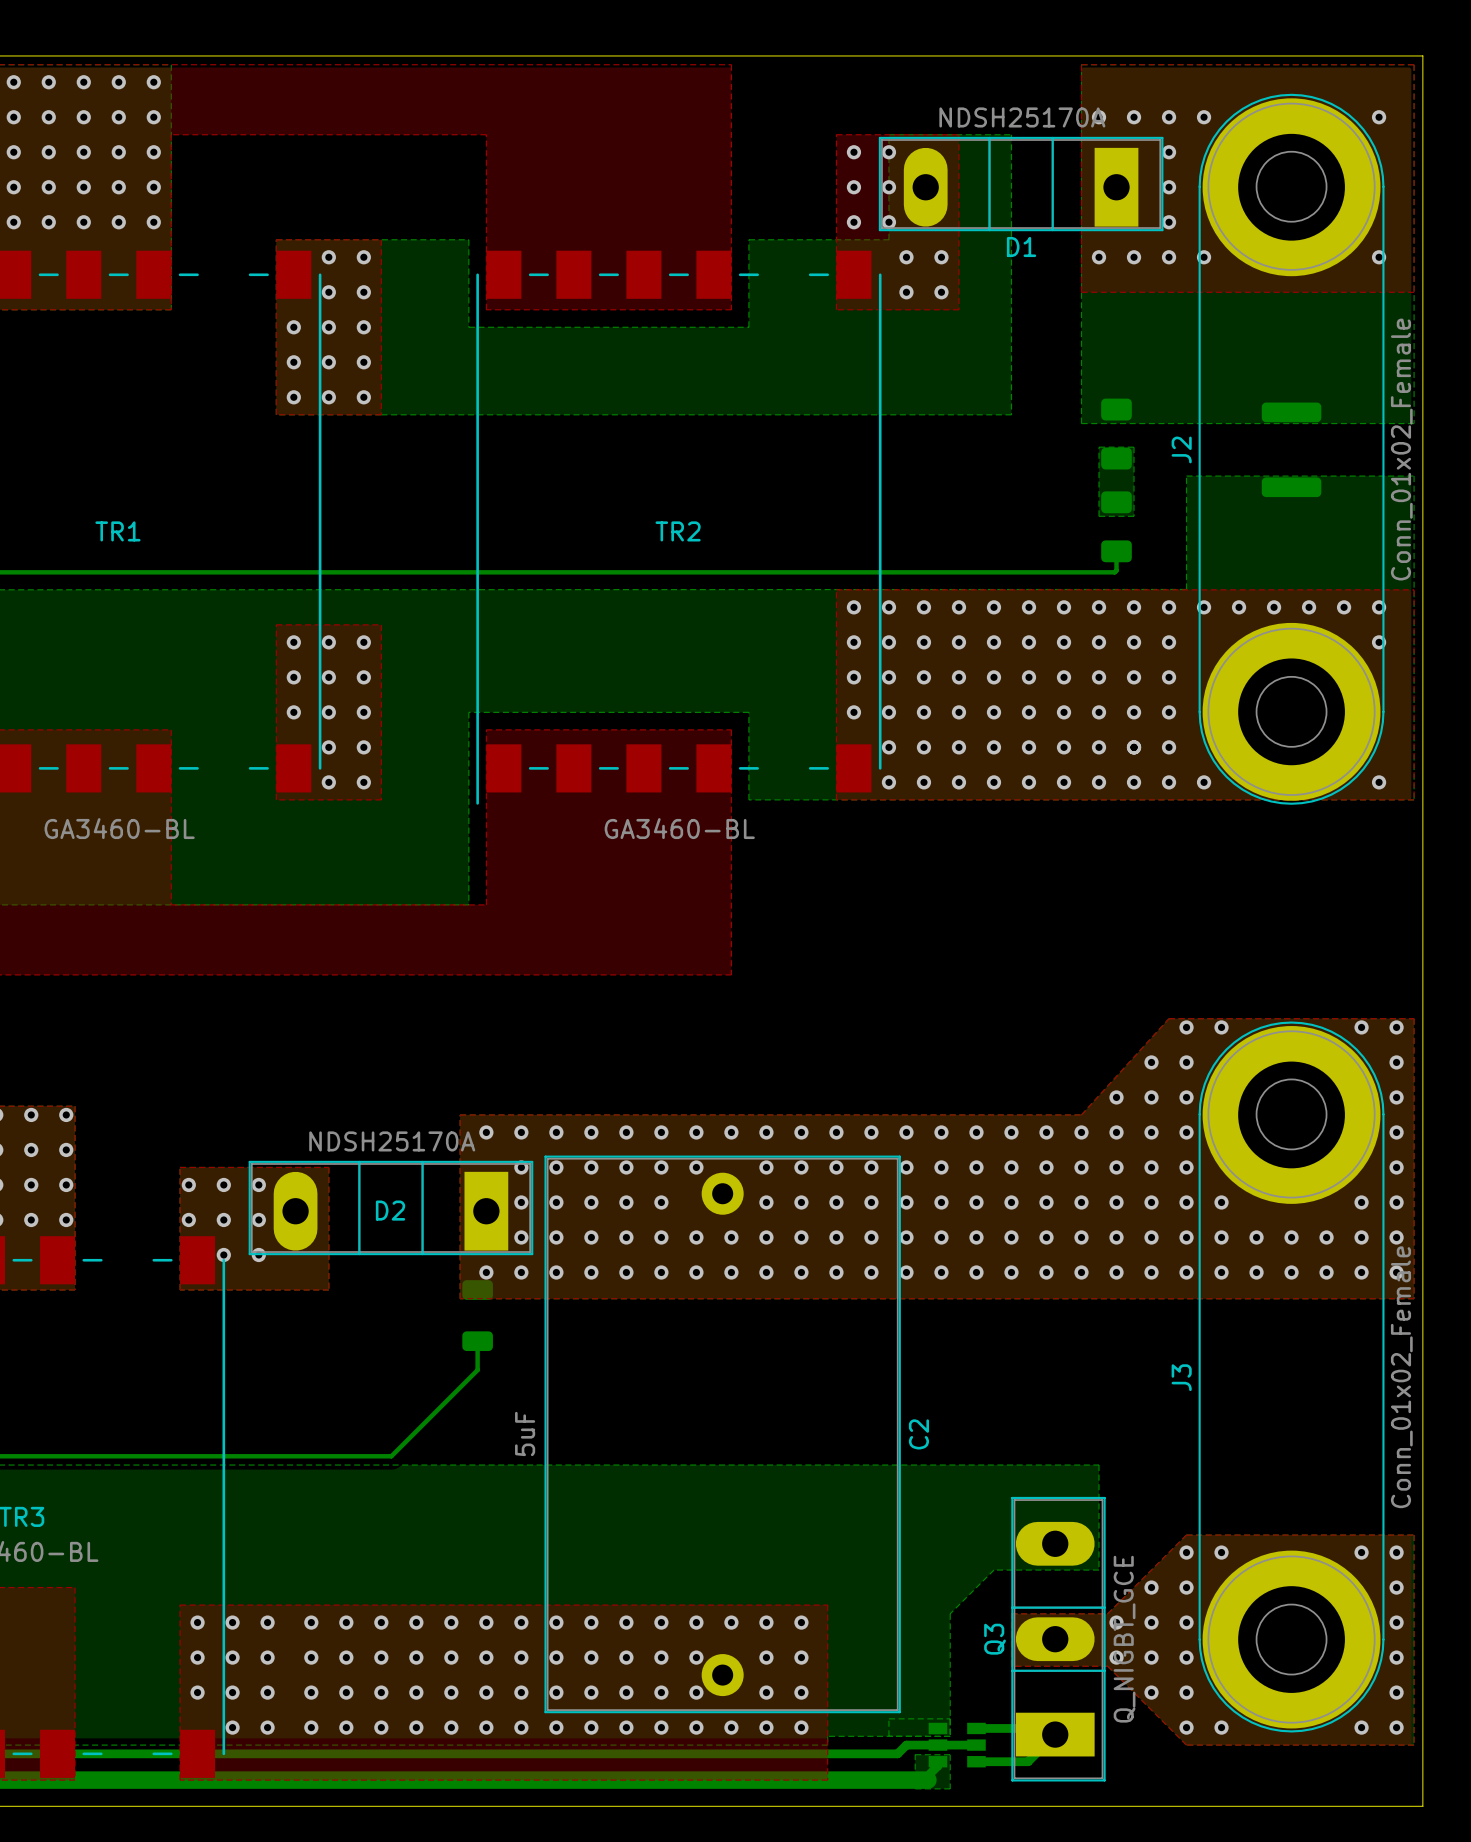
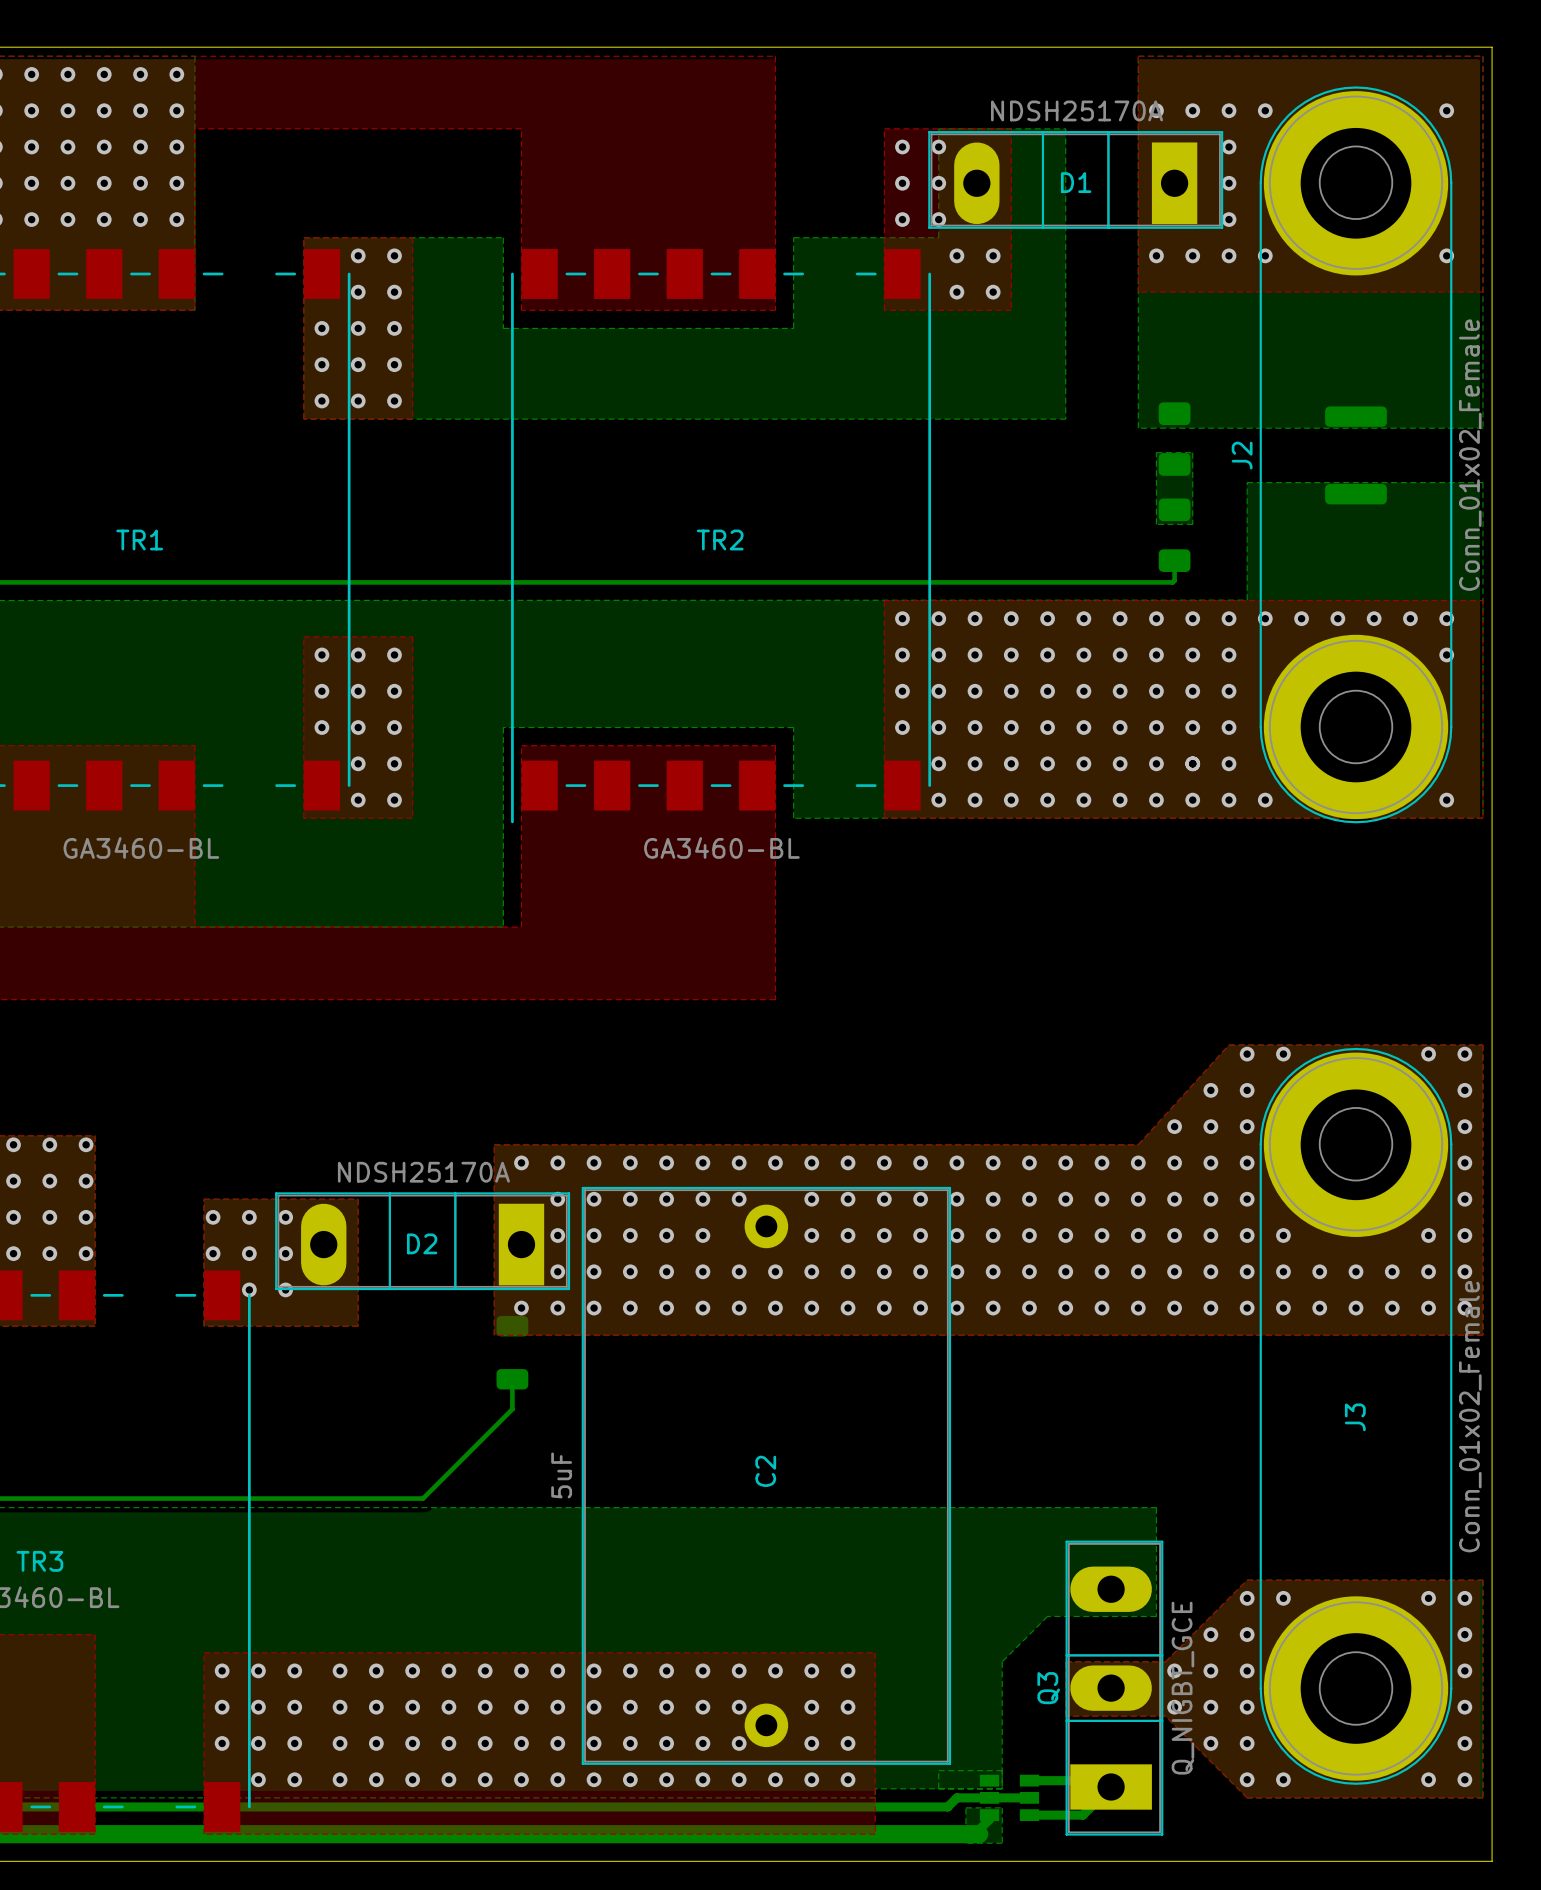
D1 name position: D1 (1021, 246) -> D1 (1076, 182)
J3 name position: J3 (1181, 1377) -> J3 (1355, 1417)
C2 name position: C2 (918, 1434) -> C2 (765, 1471)

